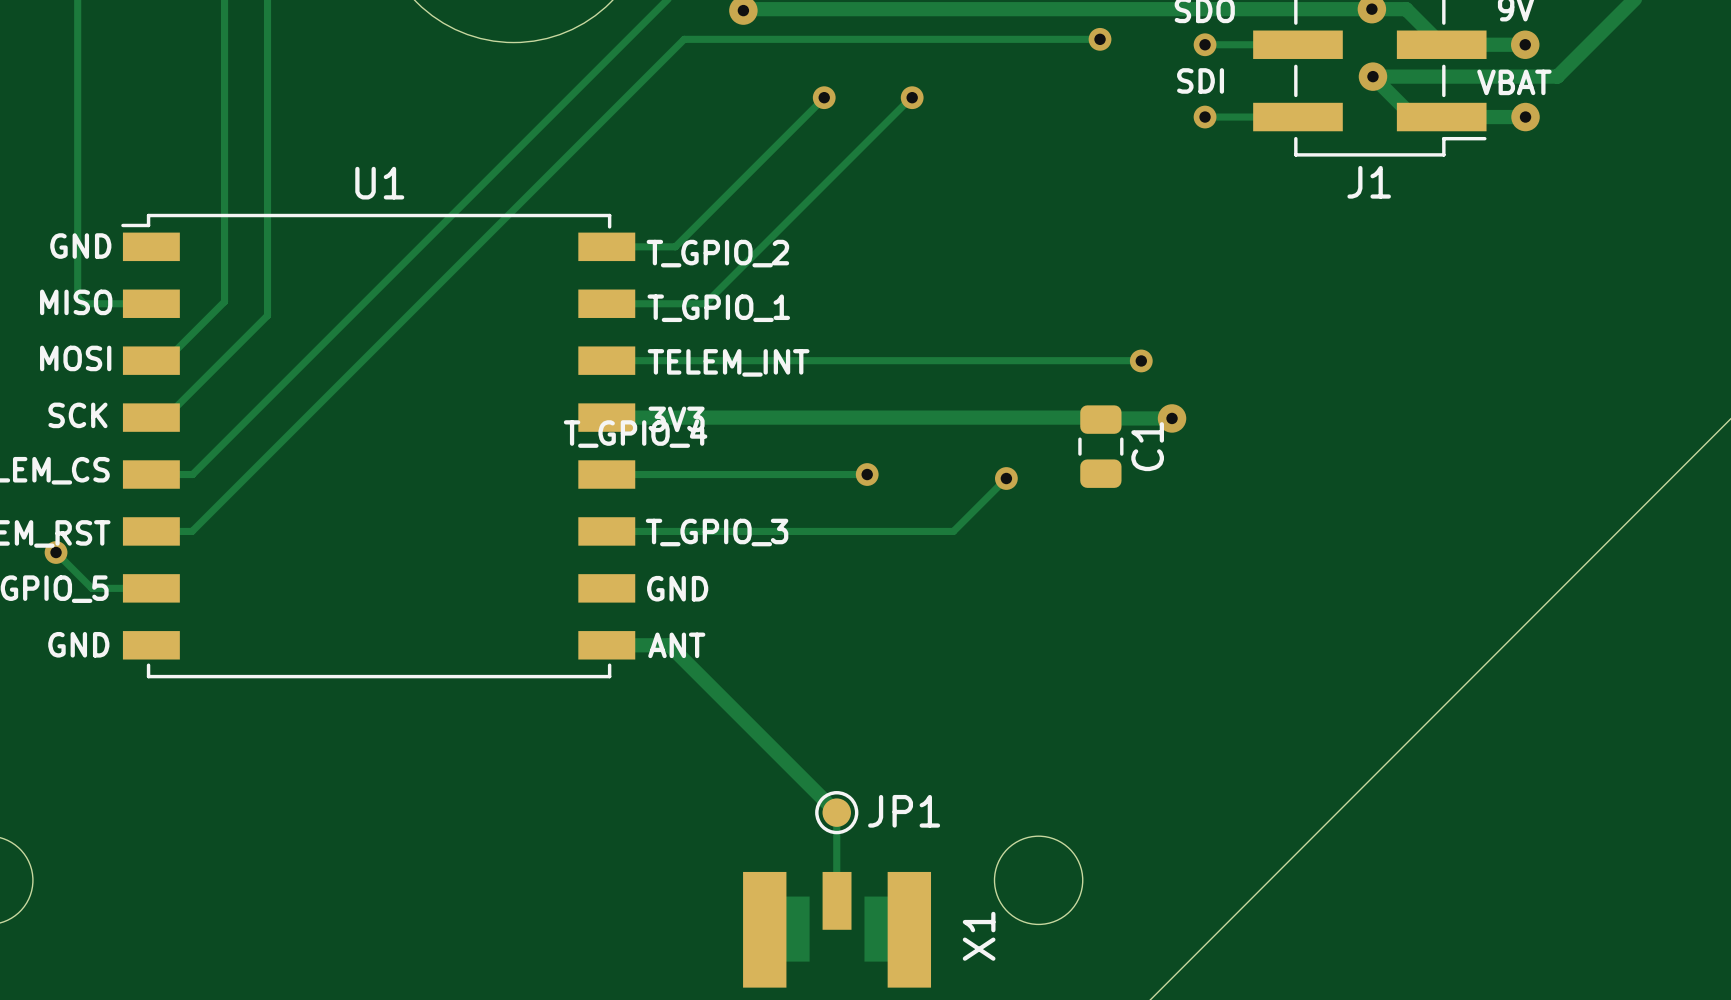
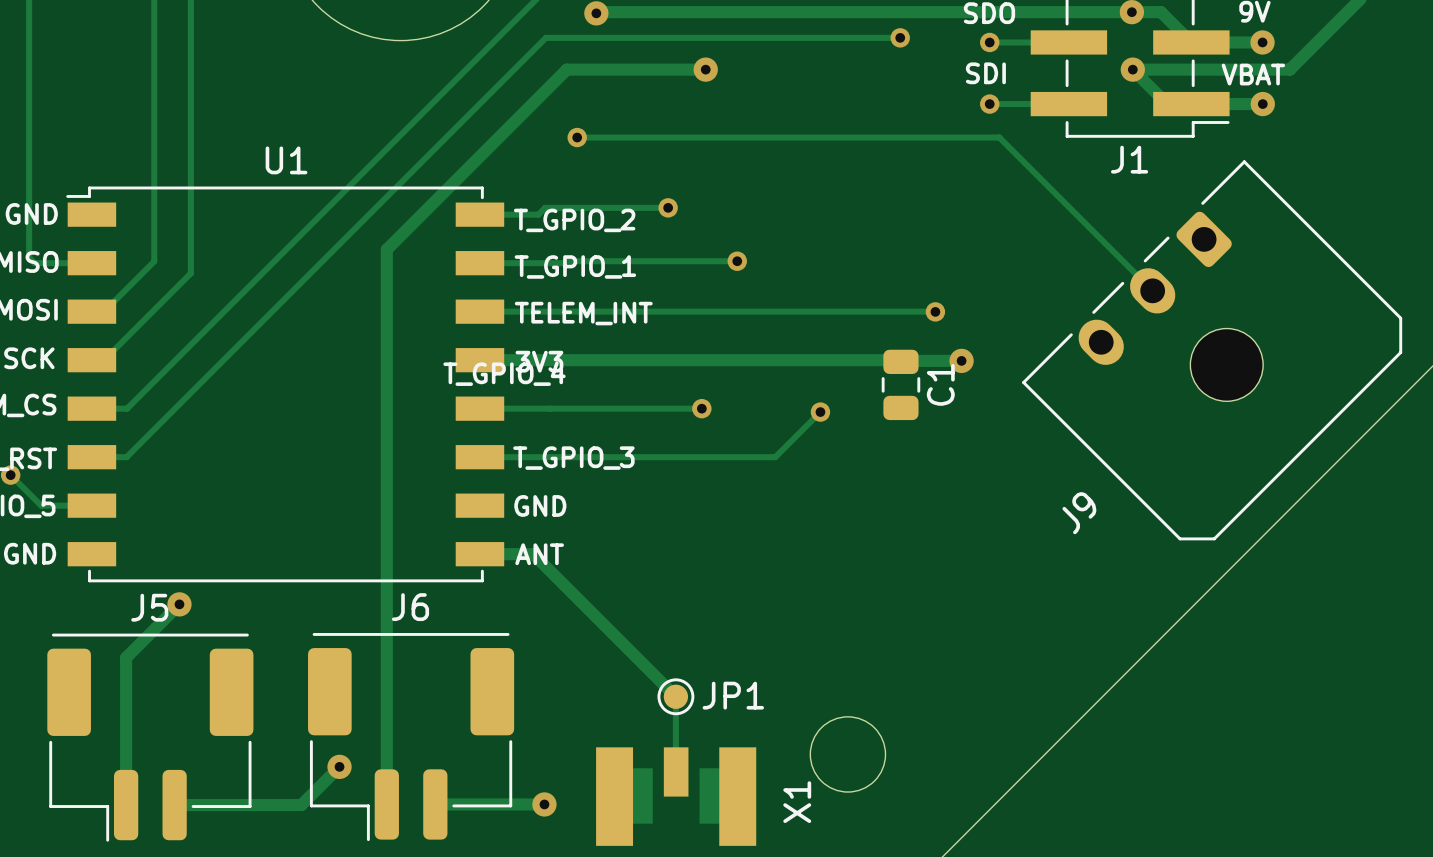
track: none -> (705, 69) (566, 69) (386, 249) (386, 804)
via: none -> (705, 69)
track: (824, 97) (683, 238) -> (668, 207) (545, 207)
via: (824, 97) -> none
track: (912, 97) (707, 301) -> (737, 261) (565, 261)
via: (912, 97) -> none
track: none -> (577, 137) (999, 137) (1152, 290)
via: none -> (577, 137)
via: none -> (668, 207)
via: none -> (737, 261)
J9: none -> (1212, 350)
track: none -> (179, 604) (126, 657) (126, 805)
via: none -> (179, 604)
J6: none -> (411, 737)
J5: none -> (150, 737)
track: none -> (339, 766) (301, 805) (174, 805)
via: none -> (339, 766)
track: none -> (435, 804) (544, 804)
via: none -> (544, 804)

